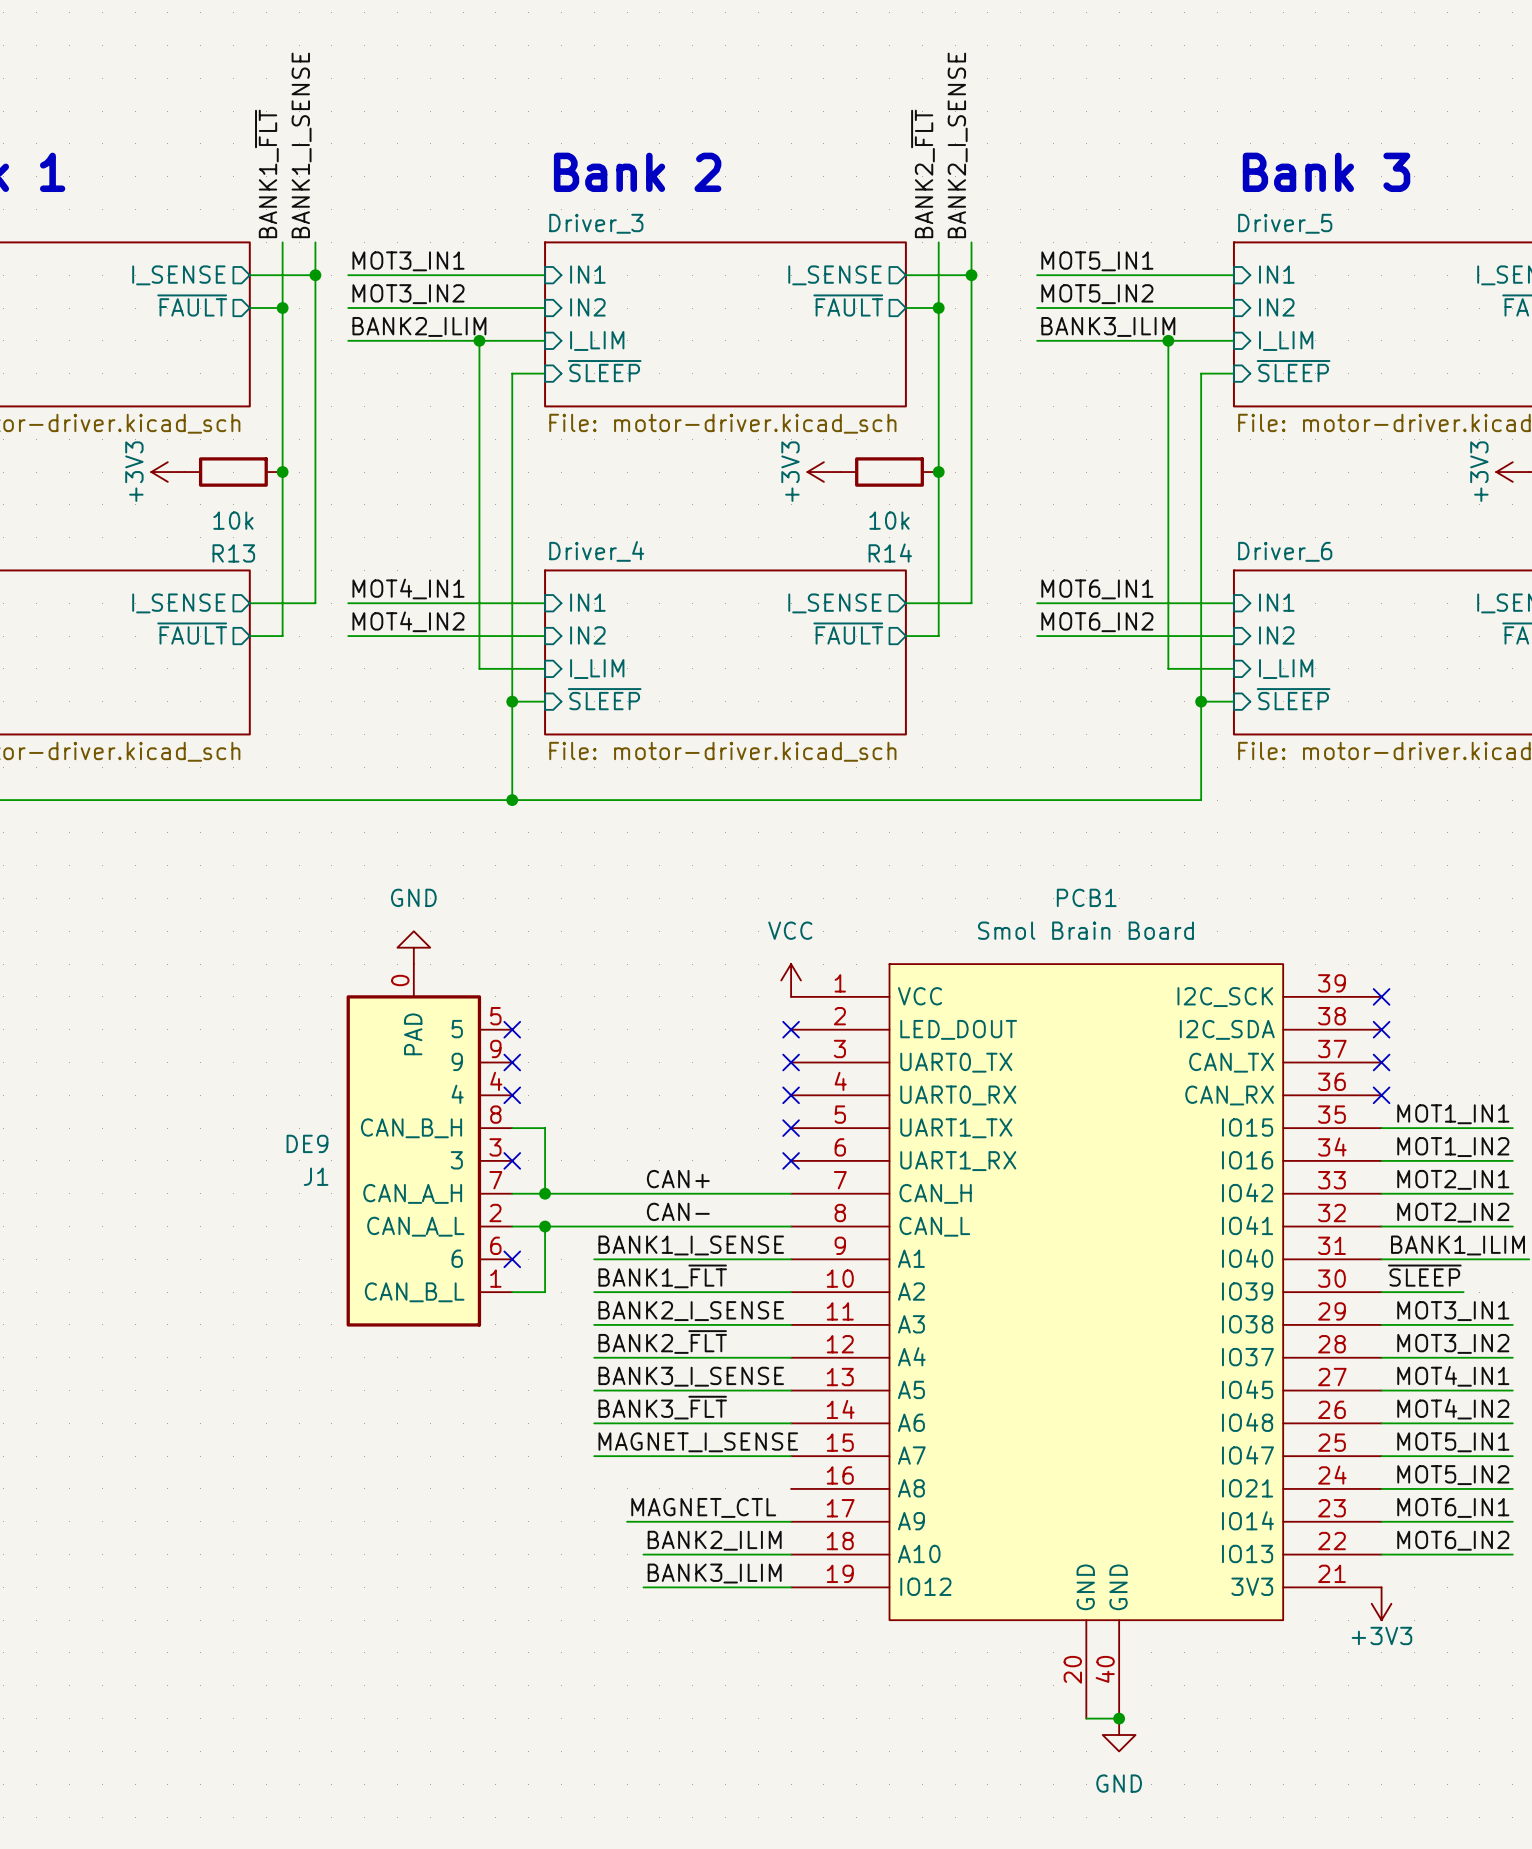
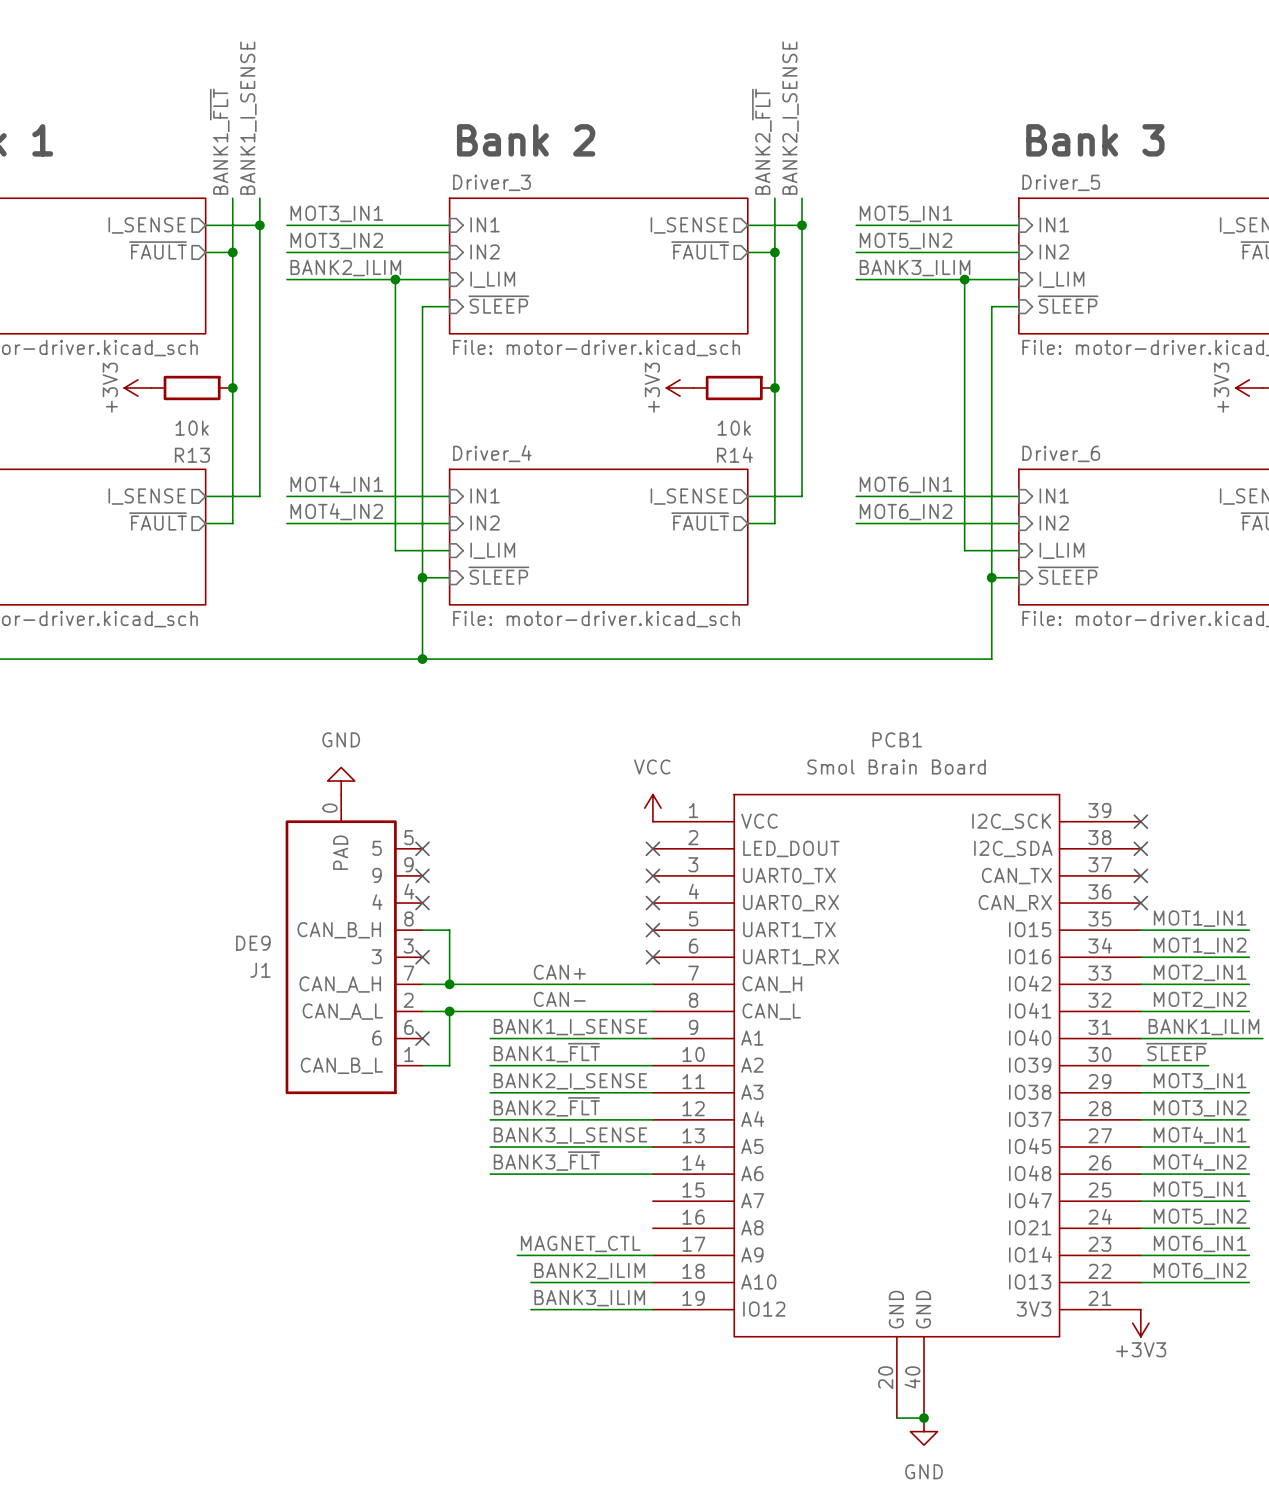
label: MAGNET_I_SENSE (698, 1442) -> none
wire: (594, 1456) (791, 1456) -> none

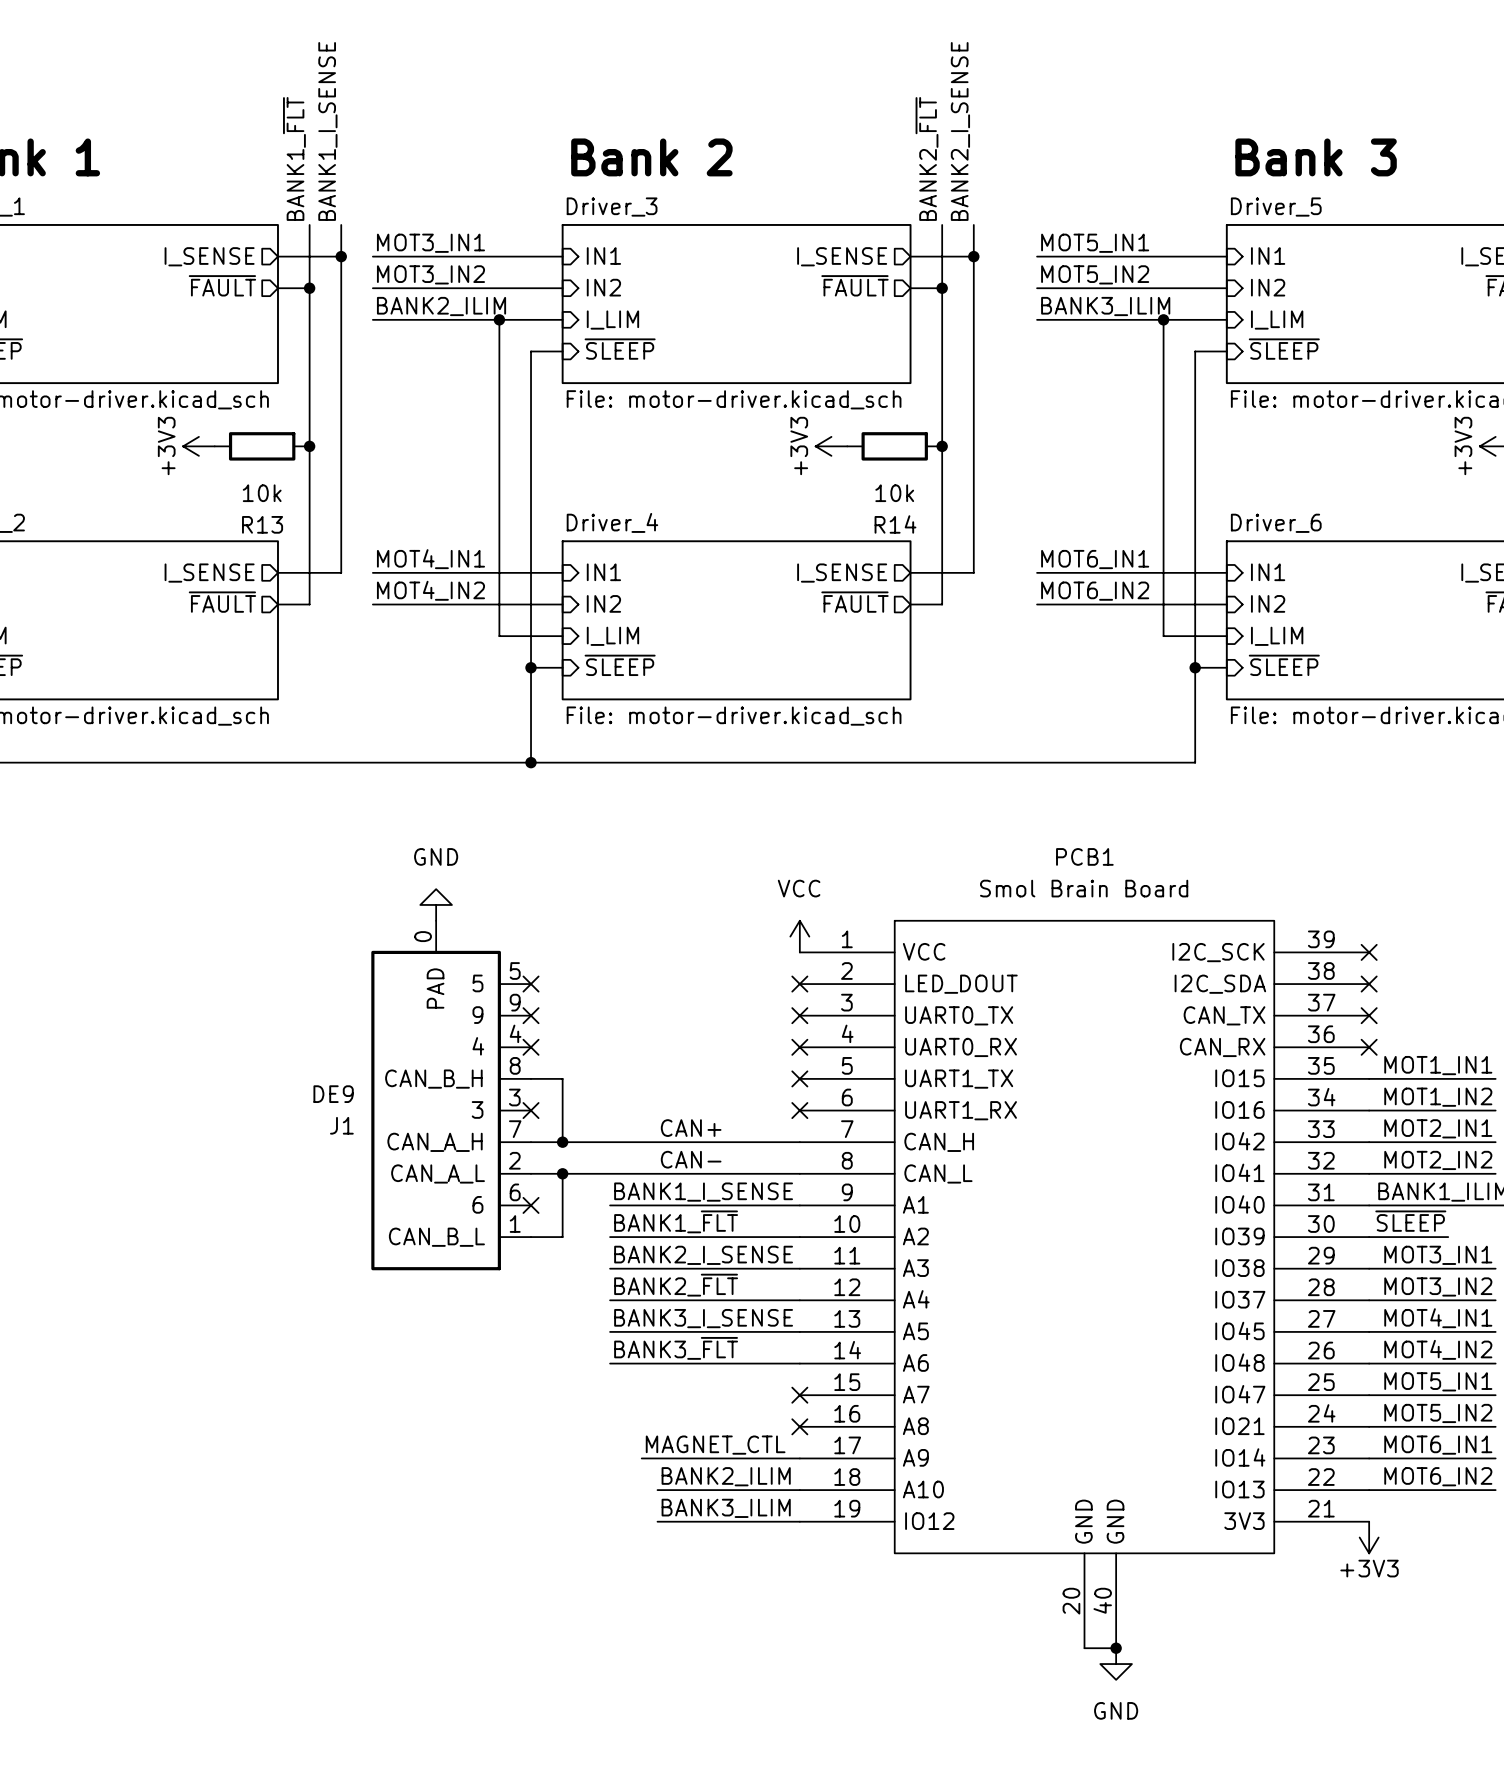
no-connect mark: none -> (799, 1395)
no-connect mark: none -> (799, 1426)

